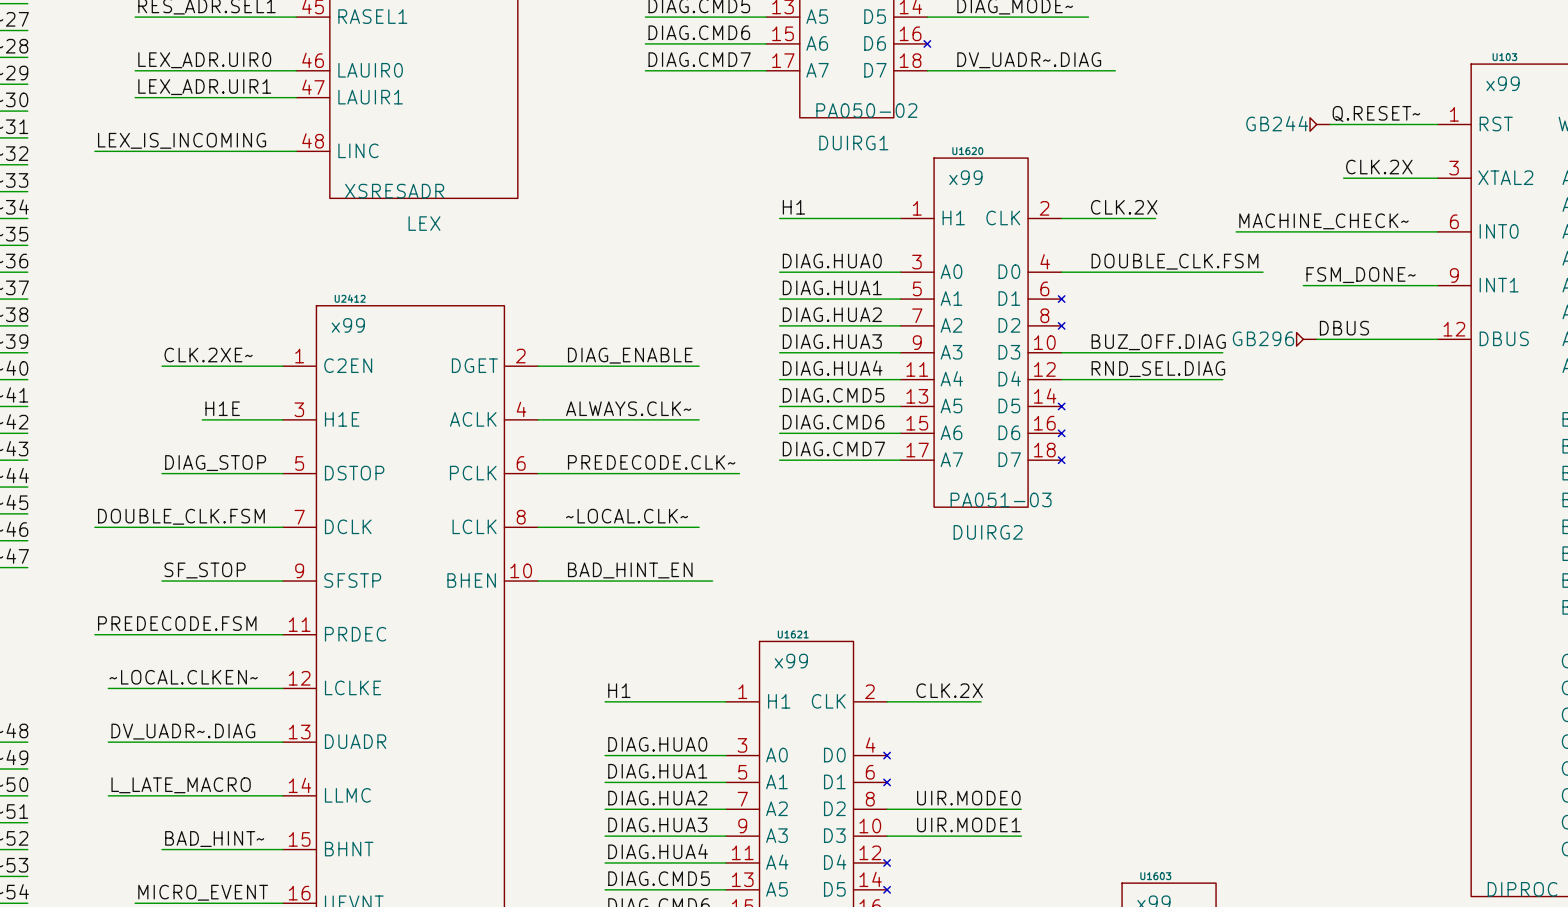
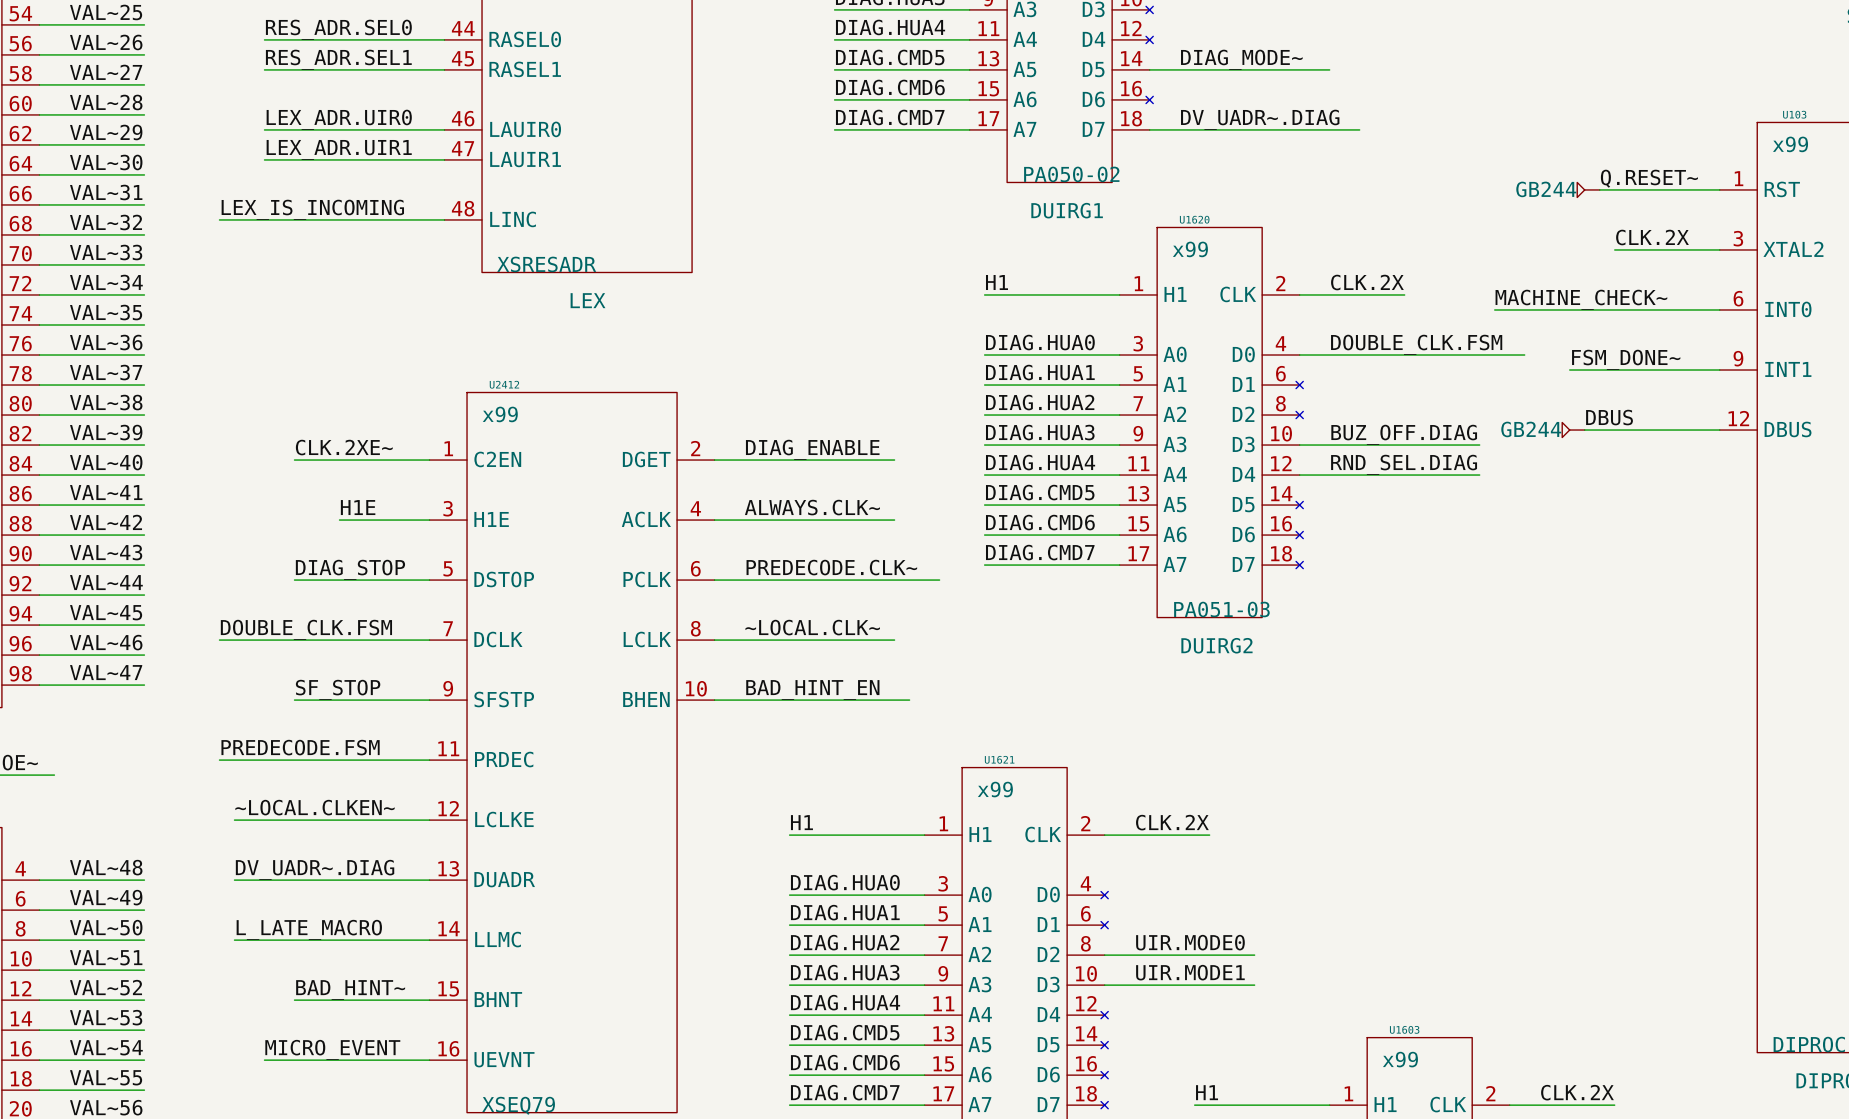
GB296 name: GB296 (1263, 338) -> GB244 (1531, 429)

